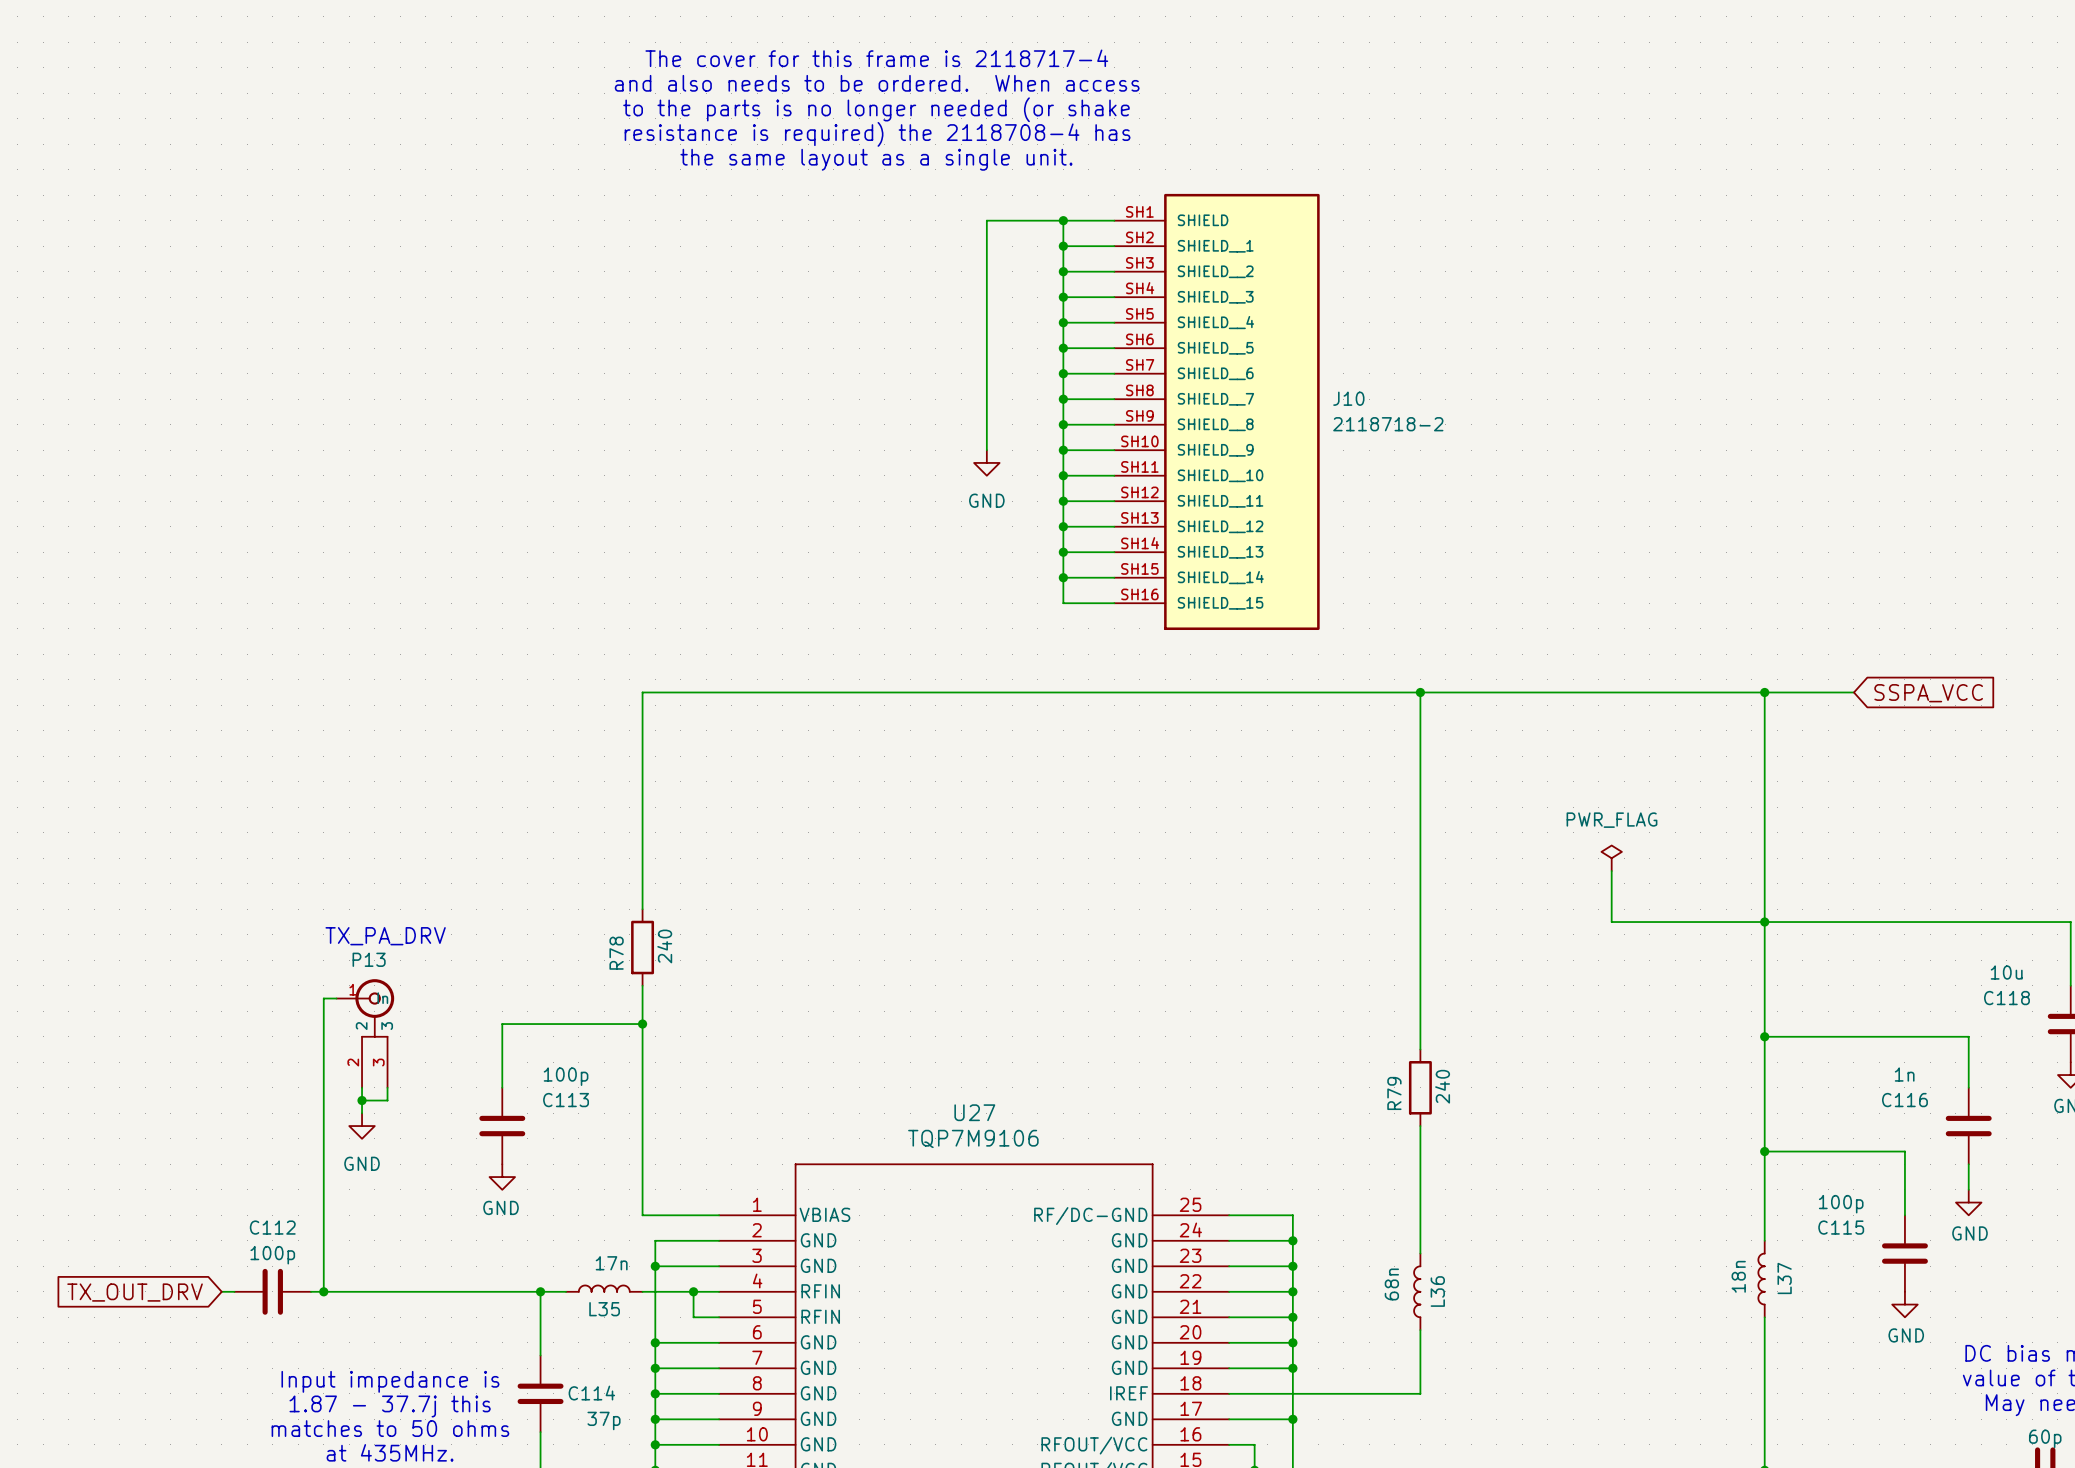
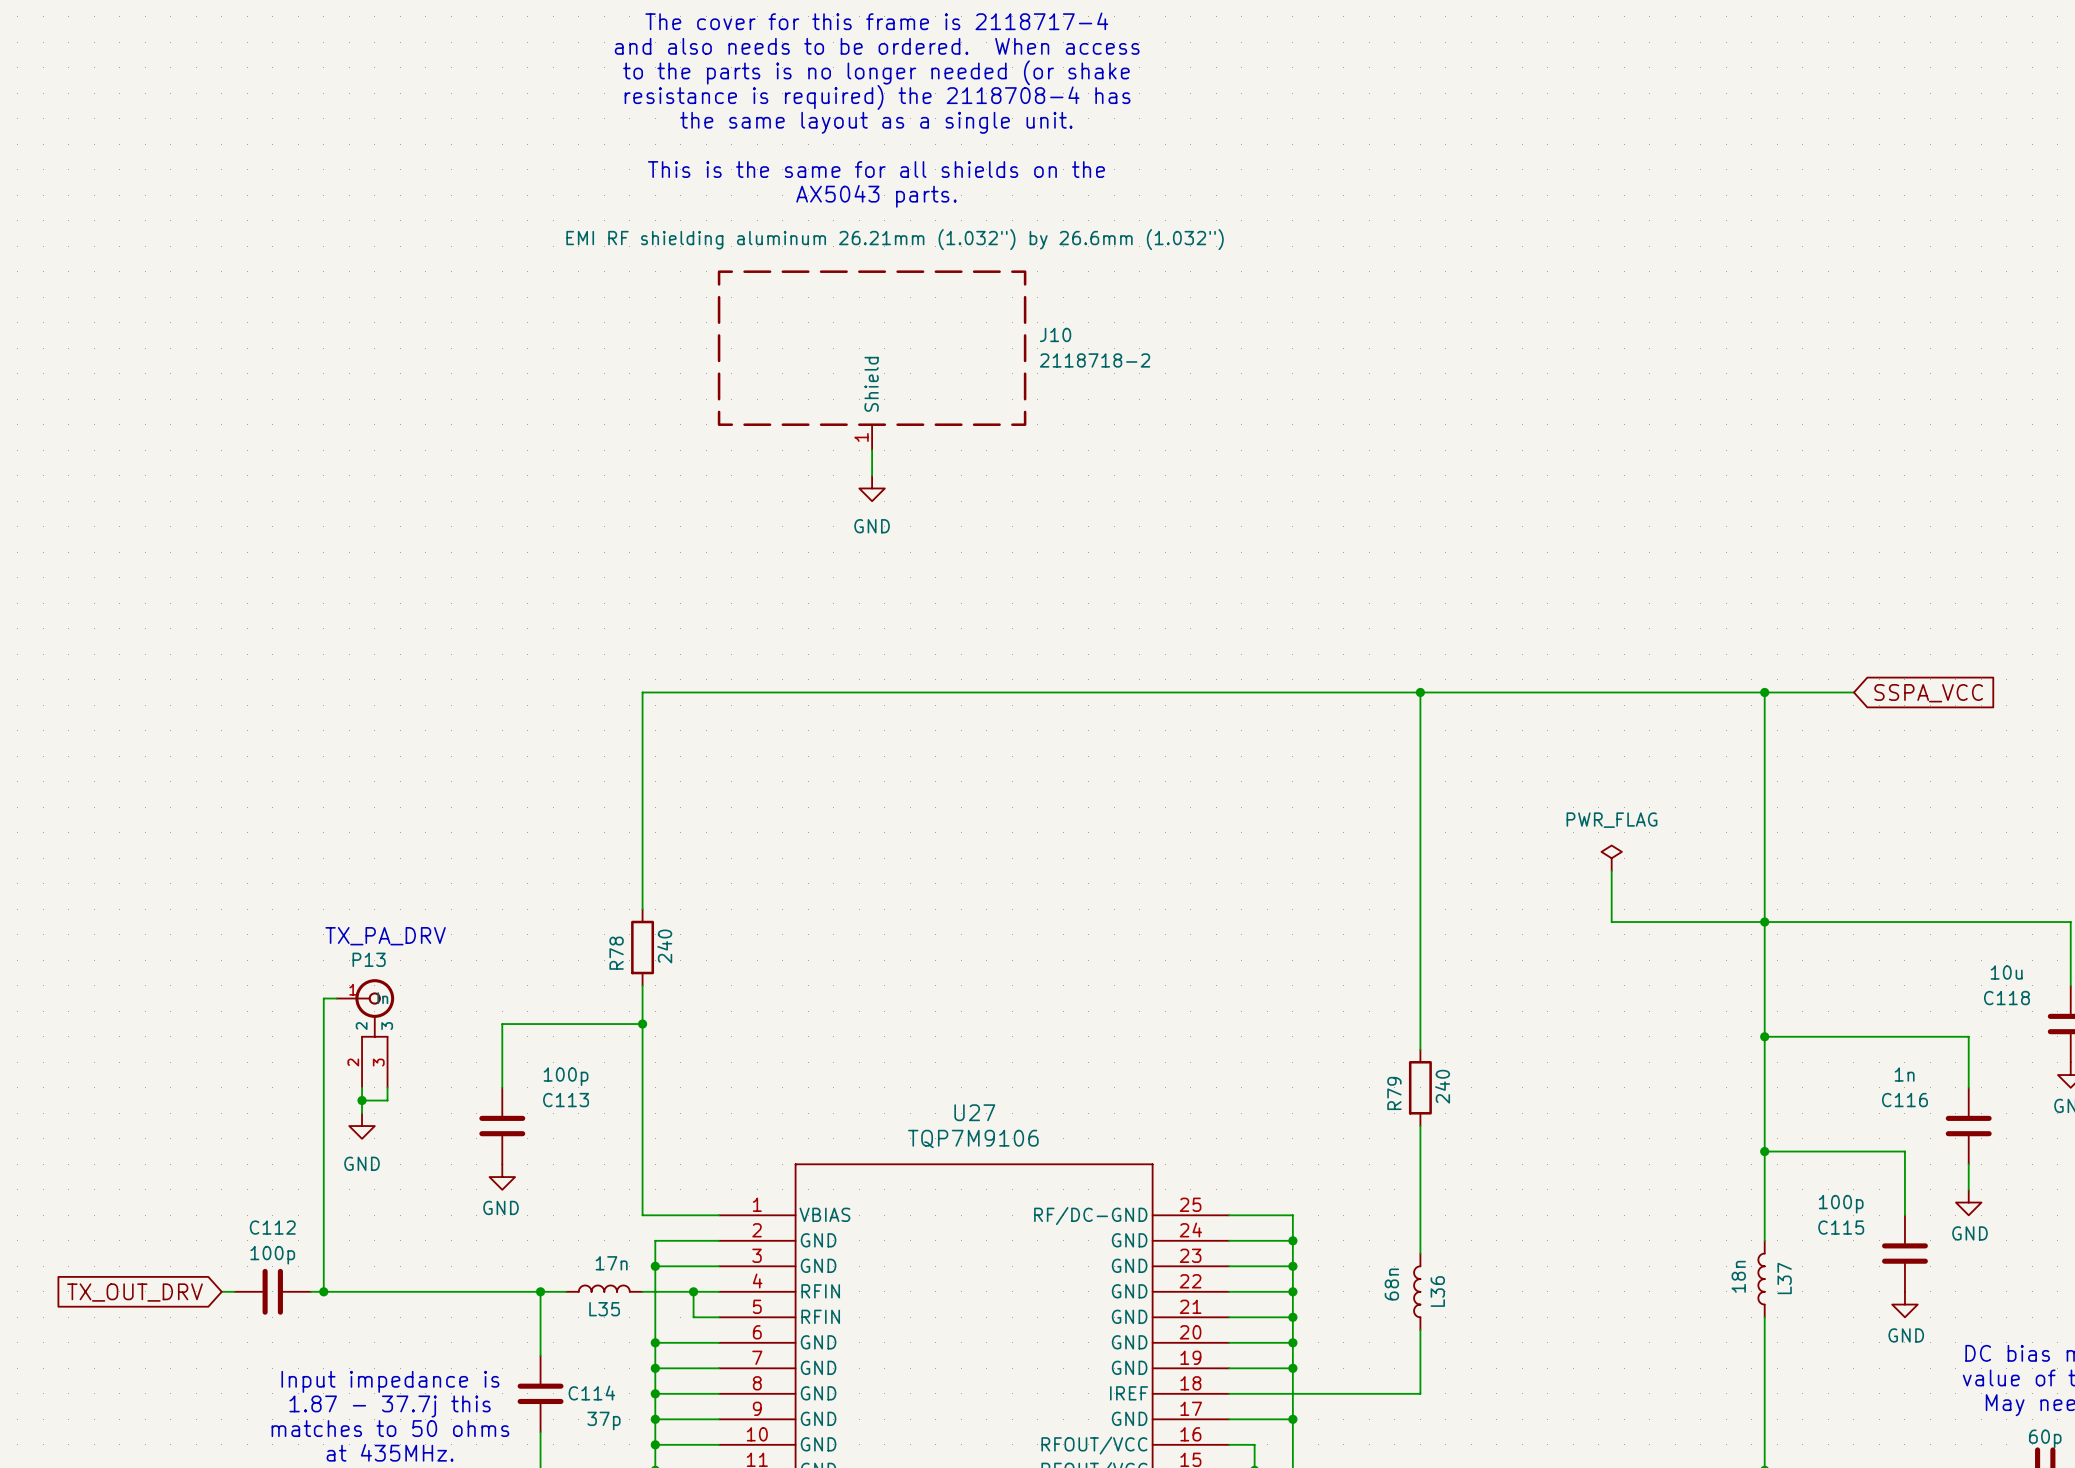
text position: The cover for this frame is 2118717-4 (876, 58) -> The cover for this frame is 2118717-4 (876, 21)
text position: and also needs to be ordered. When access (877, 83) -> and also needs to be ordered. When access (877, 46)
text position: to the parts is no longer needed (or shake (876, 109) -> to the parts is no longer needed (or shake (876, 72)
text position: resistance is required) the 2118708-4 has (877, 134) -> resistance is required) the 2118708-4 has (877, 97)
text position: the same layout as a single unit. (876, 159) -> the same layout as a single unit. (876, 122)
text: none -> This is the same for all shields on the (876, 169)
J10 symbol: [1114, 193, 1320, 631] -> [717, 270, 1027, 451]
text: none -> AX5043 parts. (876, 196)
wire: (1063, 220) (1063, 603) (1114, 603) -> none
junction: (1063, 220) -> none
wire: (1114, 220) (986, 220) (986, 450) -> none
J10 text: none -> EMI RF shielding aluminum 26.21mm (1.032") by 26.6mm (1.032") (895, 239)
wire: (1063, 246) (1114, 246) -> none
junction: (1063, 246) -> none
wire: (1063, 271) (1114, 271) -> none
junction: (1063, 271) -> none
wire: (1063, 297) (1114, 297) -> none
junction: (1063, 297) -> none
wire: (1063, 322) (1114, 322) -> none
junction: (1063, 322) -> none
wire: (1063, 348) (1114, 348) -> none
junction: (1063, 348) -> none
wire: (1063, 373) (1114, 373) -> none
junction: (1063, 373) -> none
J10 name position: J10 (1348, 398) -> J10 (1055, 334)
wire: (1063, 399) (1114, 399) -> none
junction: (1063, 399) -> none
wire: (1063, 424) (1114, 424) -> none
junction: (1063, 424) -> none
J10 value position: 2118718-2 (1388, 424) -> 2118718-2 (1095, 360)
wire: none -> (872, 450) (872, 475)
wire: (1063, 450) (1114, 450) -> none
junction: (1063, 450) -> none
power symbol position: GND (986, 462) -> GND (872, 488)
wire: (1063, 475) (1114, 475) -> none
junction: (1063, 475) -> none
wire: (1063, 501) (1114, 501) -> none
junction: (1063, 501) -> none
wire: (1063, 526) (1114, 526) -> none
junction: (1063, 526) -> none
wire: (1063, 552) (1114, 552) -> none
junction: (1063, 552) -> none
wire: (1063, 577) (1114, 577) -> none
junction: (1063, 577) -> none

